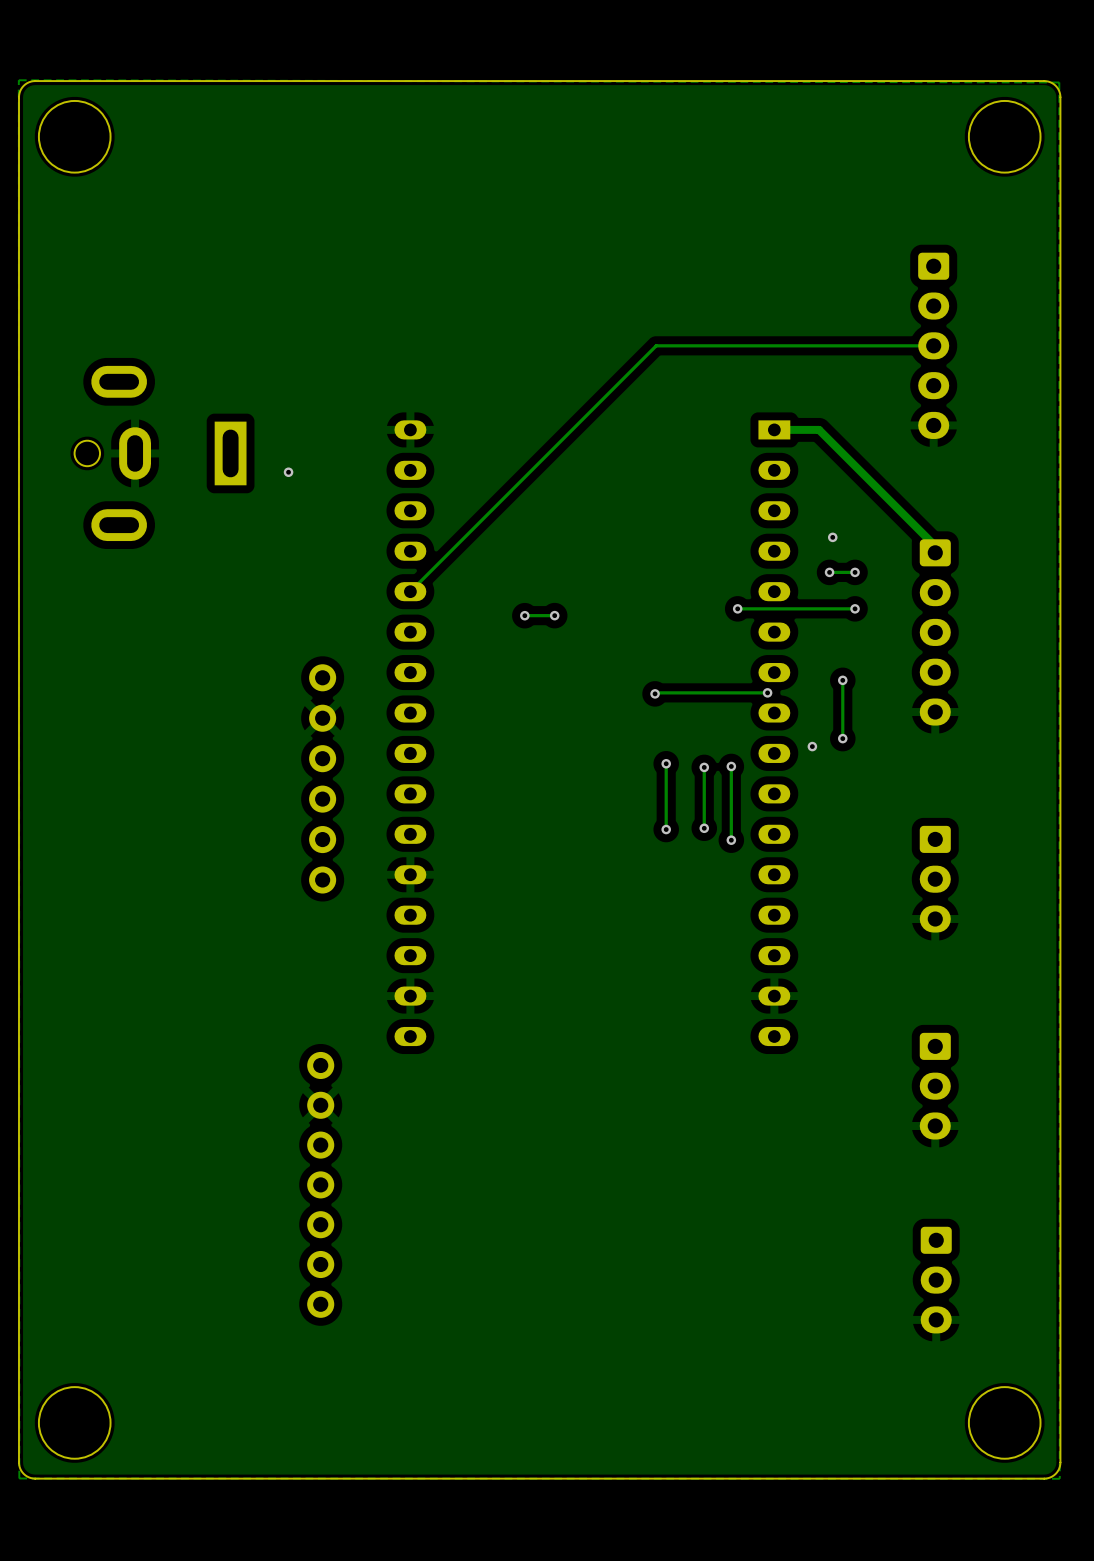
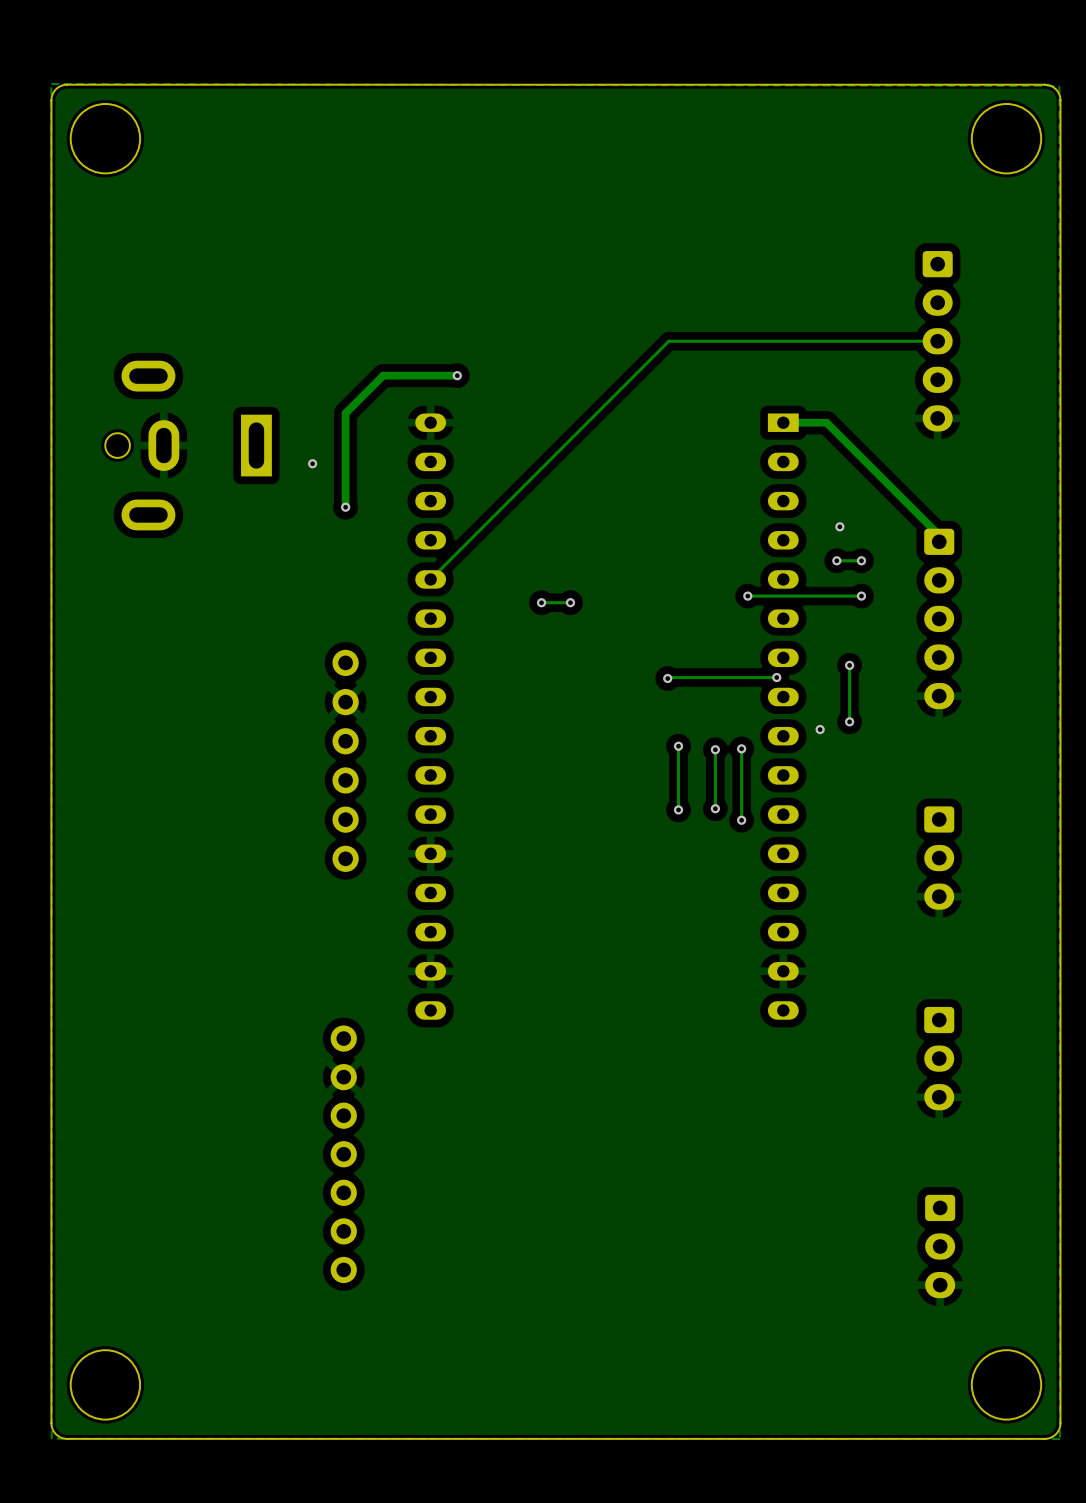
track: none -> (457, 375) (383, 375) (345, 413) (345, 507)
via: none -> (457, 375)
via: none -> (345, 507)

